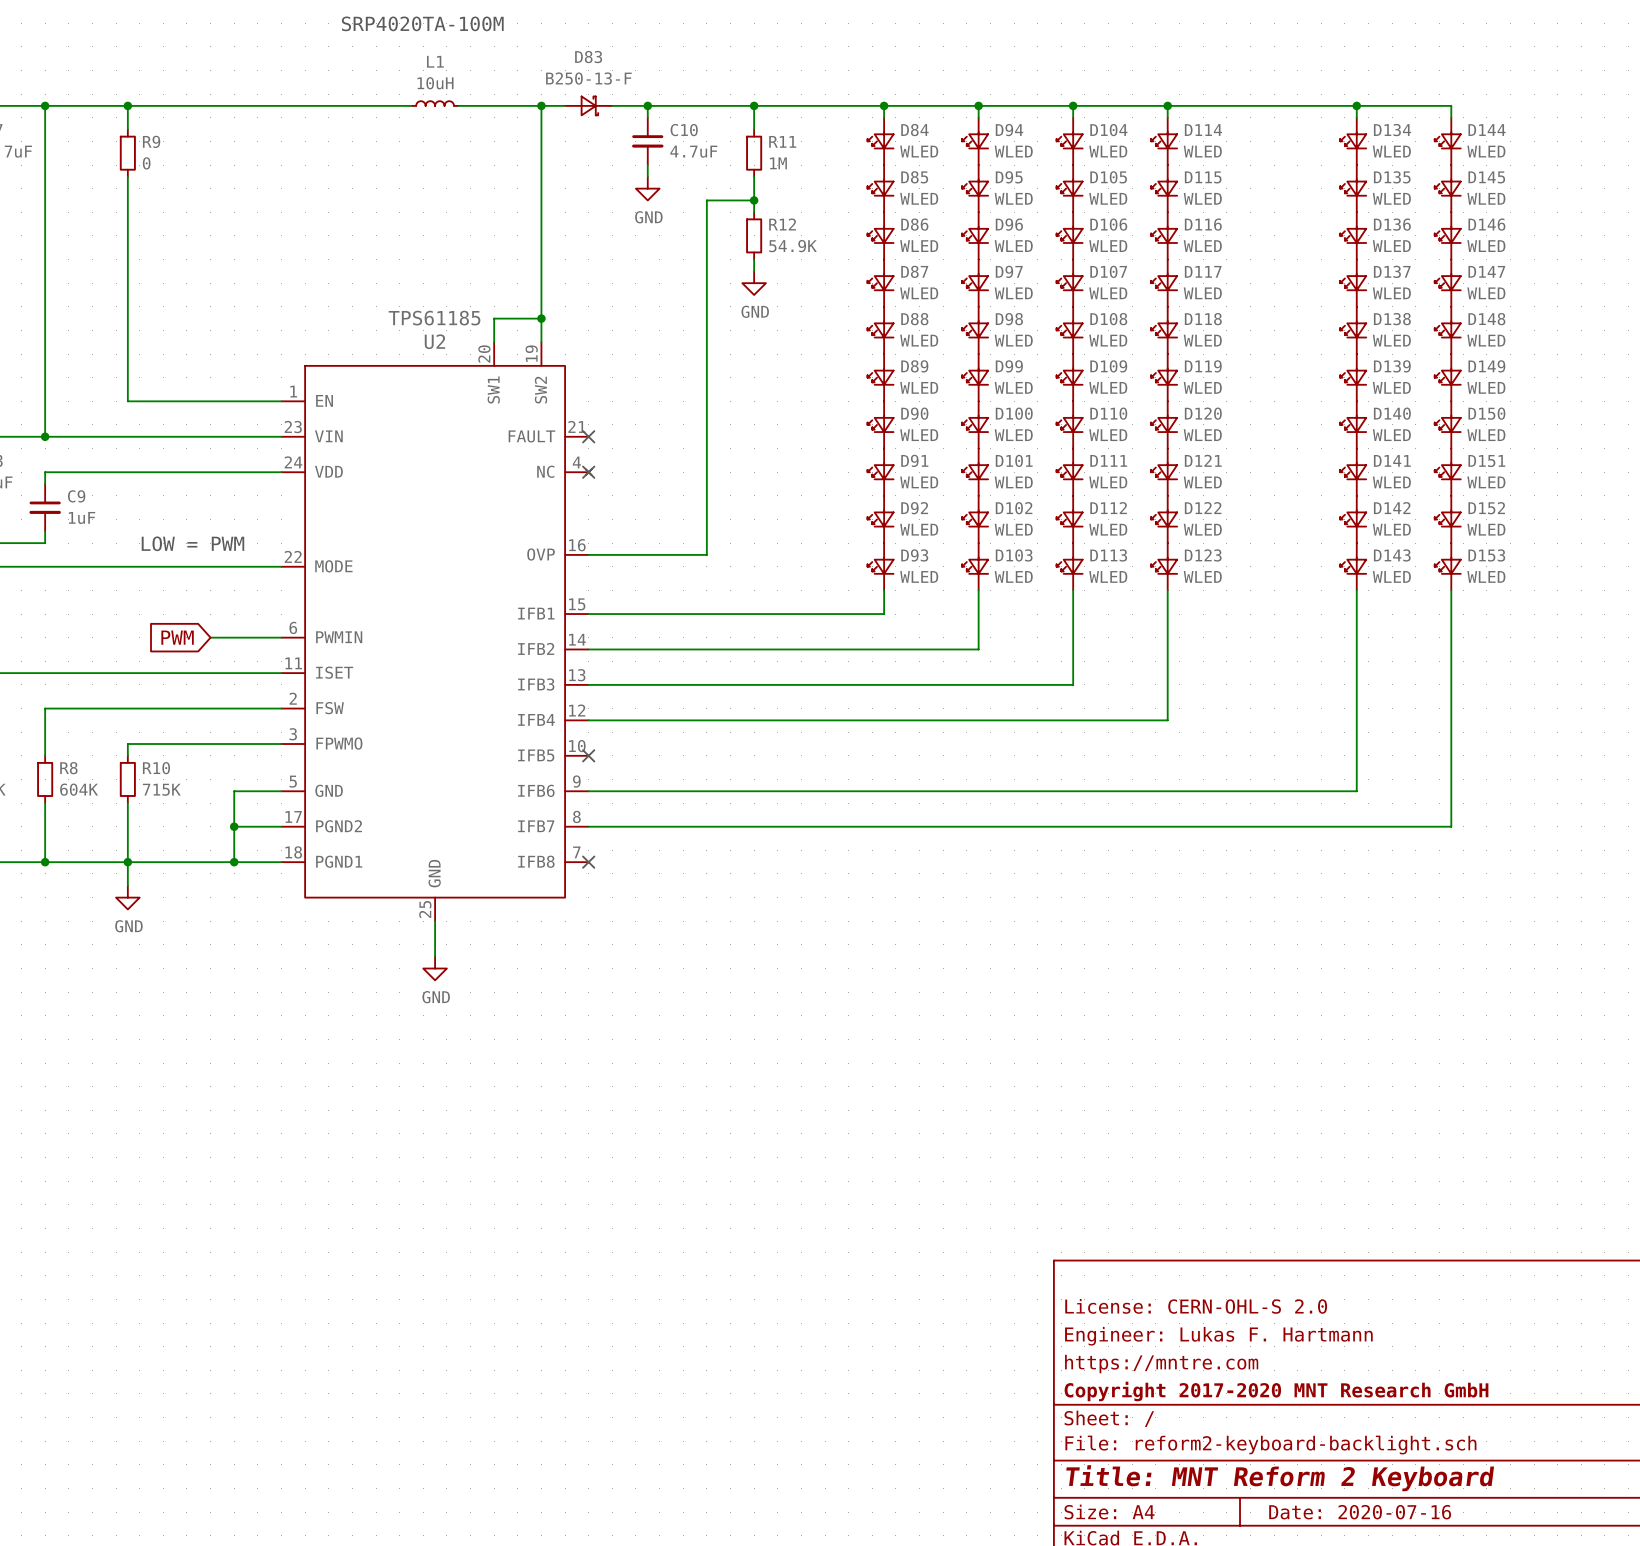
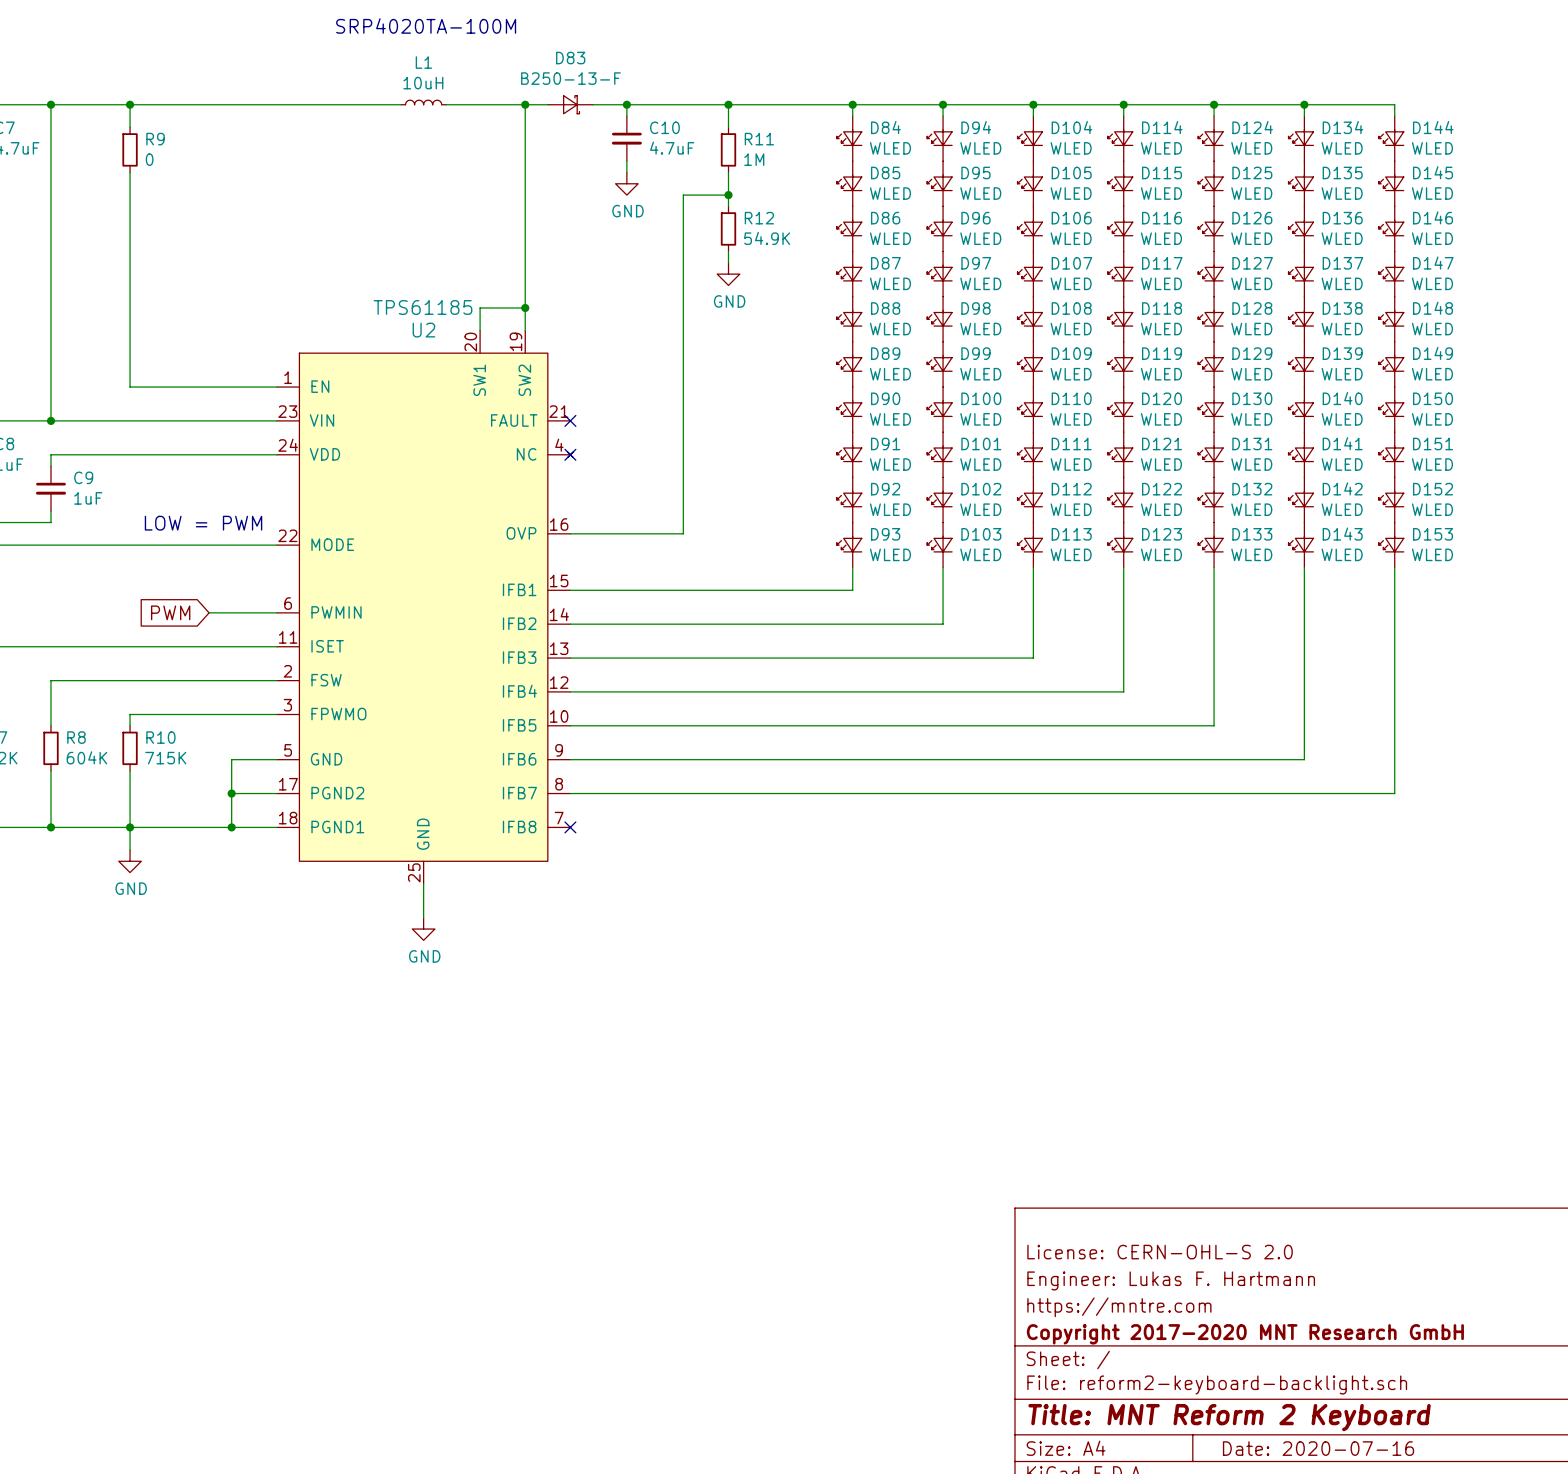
wire: none -> (1214, 104) (1214, 116)
junction: none -> (1214, 104)
D124: none -> WLED (1210, 138)
D125: none -> WLED (1210, 183)
D126: none -> WLED (1210, 228)
D127: none -> WLED (1210, 274)
D128: none -> WLED (1210, 319)
D129: none -> WLED (1210, 364)
D130: none -> WLED (1210, 409)
D131: none -> WLED (1210, 454)
D132: none -> WLED (1210, 499)
D133: none -> WLED (1210, 545)
wire: none -> (1214, 567) (1214, 725) (570, 725)
no-connect mark: (588, 755) -> none

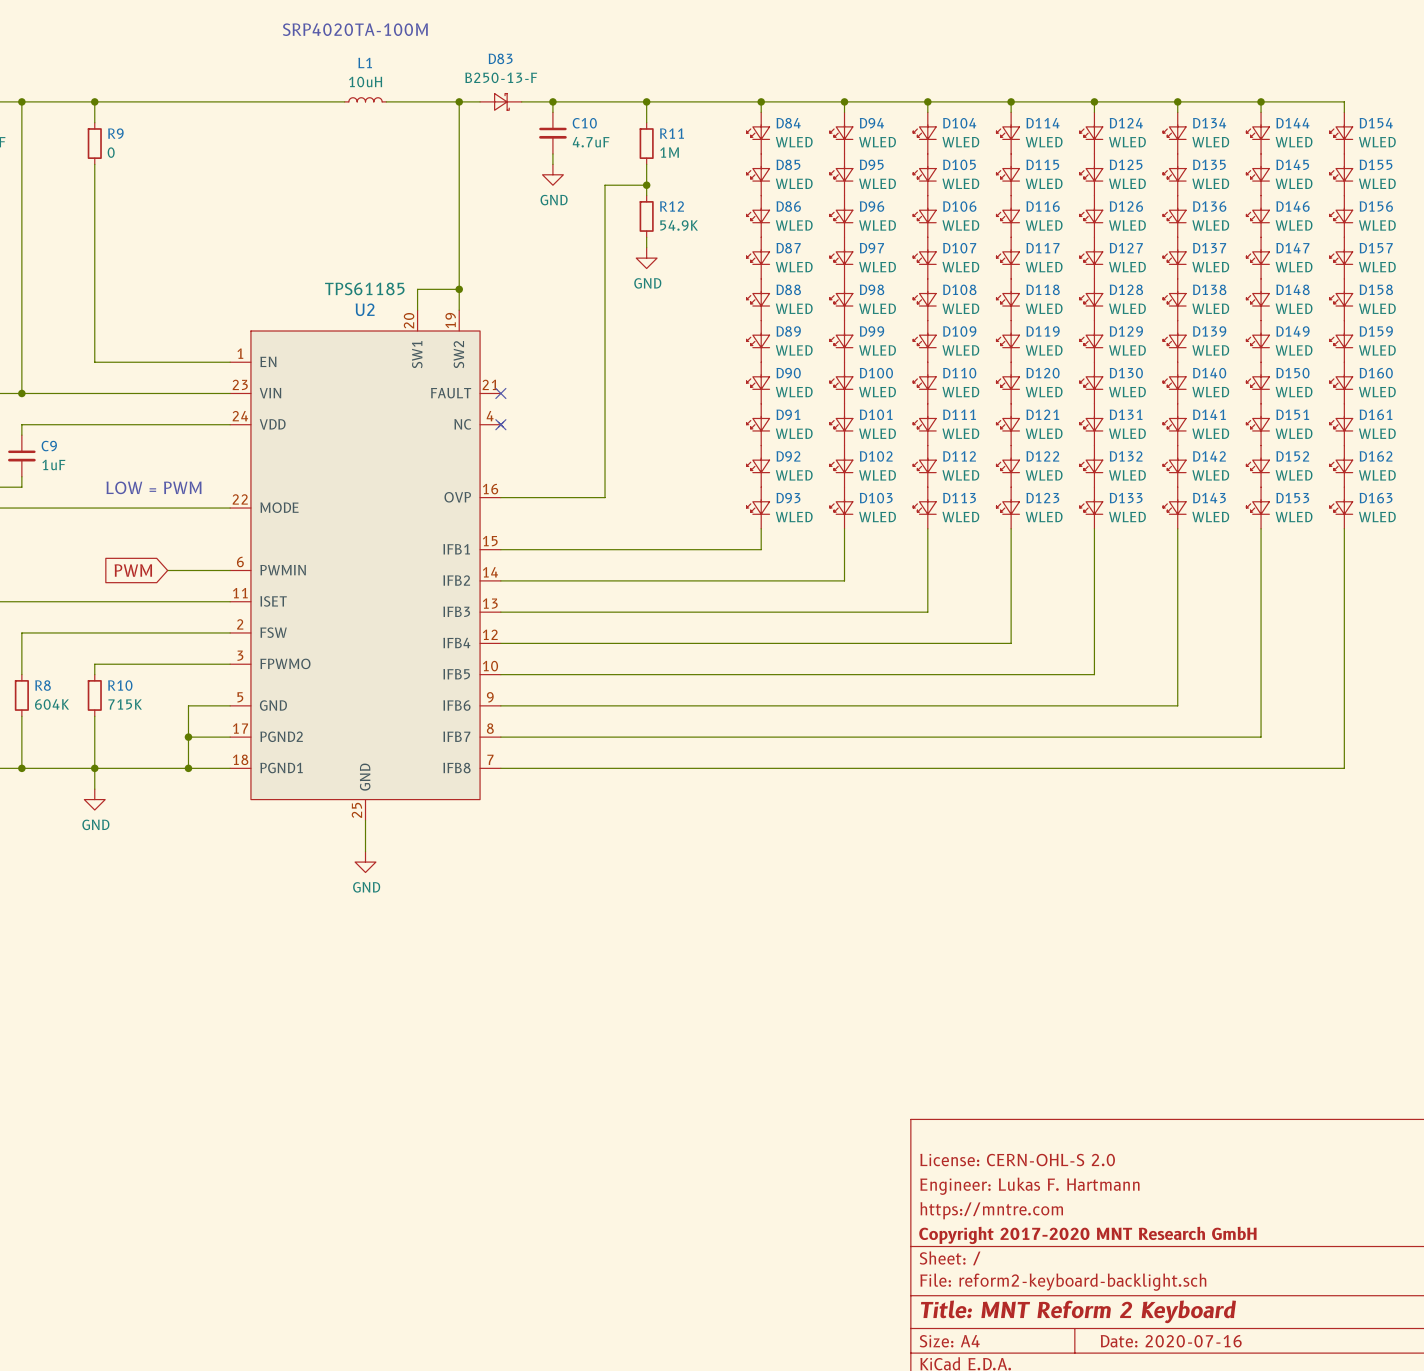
wire: none -> (1261, 101) (1344, 101) (1344, 112)
junction: none -> (1261, 101)
D154: none -> WLED (1341, 133)
D155: none -> WLED (1341, 174)
D156: none -> WLED (1341, 216)
D157: none -> WLED (1341, 258)
D158: none -> WLED (1341, 299)
D159: none -> WLED (1341, 341)
D160: none -> WLED (1341, 383)
D161: none -> WLED (1341, 424)
D162: none -> WLED (1341, 466)
D163: none -> WLED (1341, 508)
wire: none -> (1344, 528) (1344, 768) (500, 768)
no-connect mark: (570, 827) -> none

